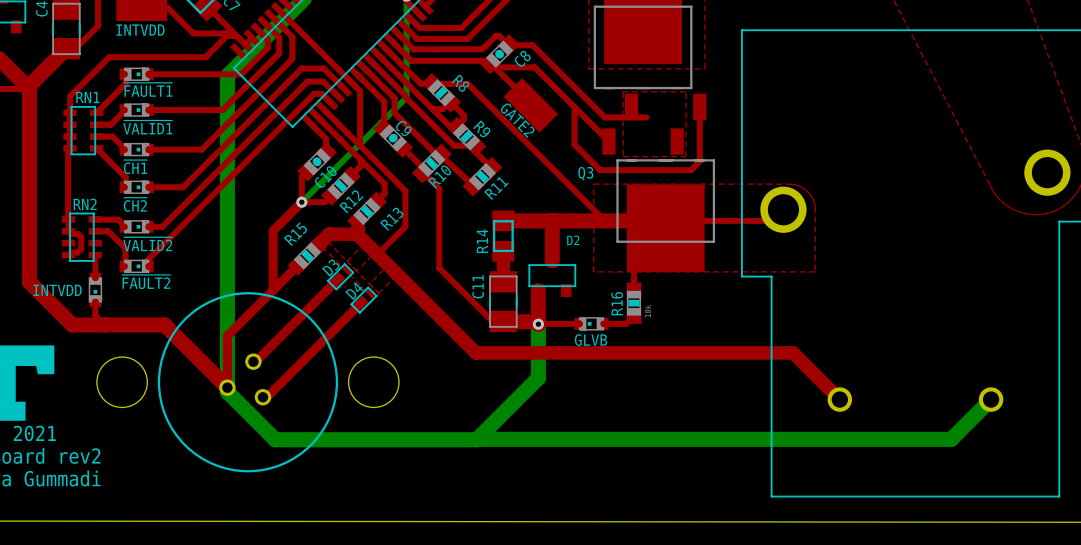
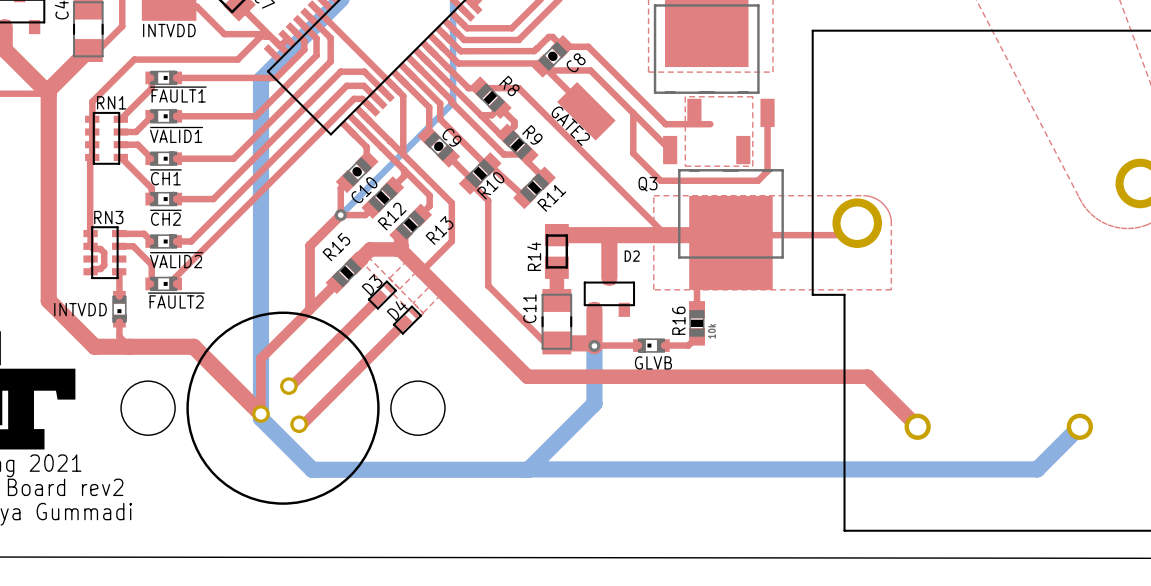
RN2 name: RN2 (85, 204) -> RN3 (108, 217)

